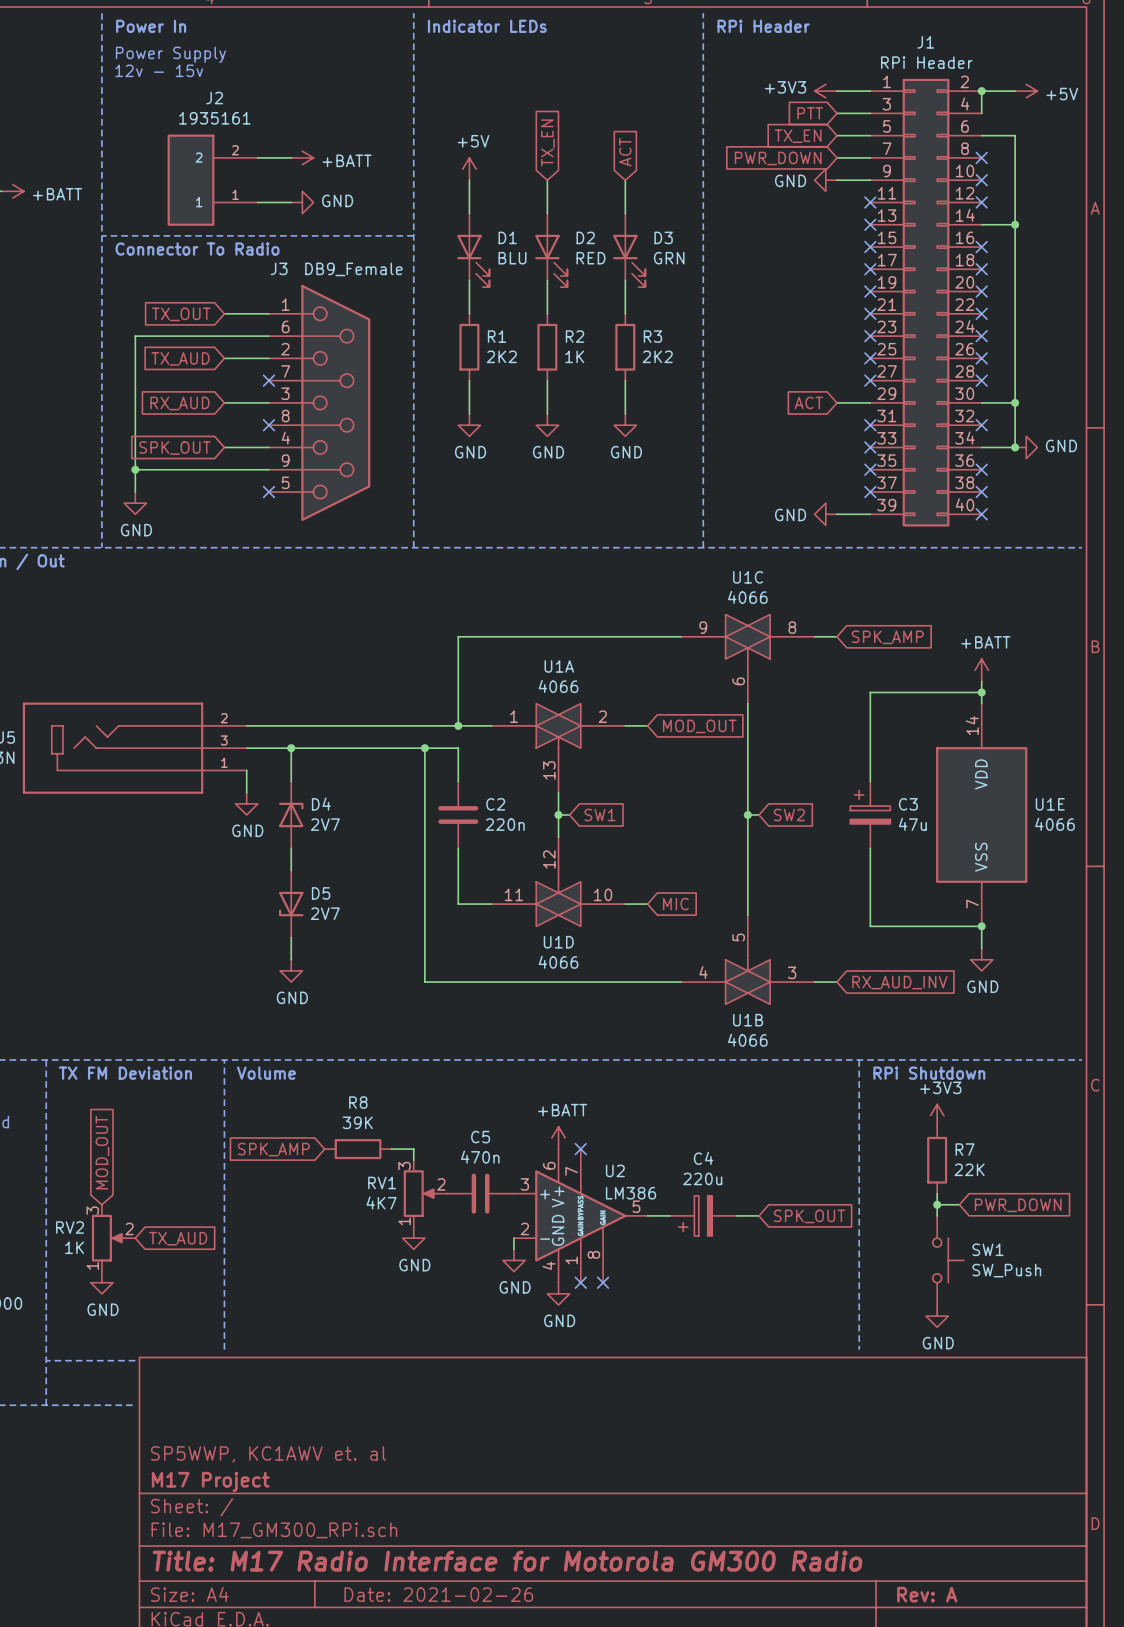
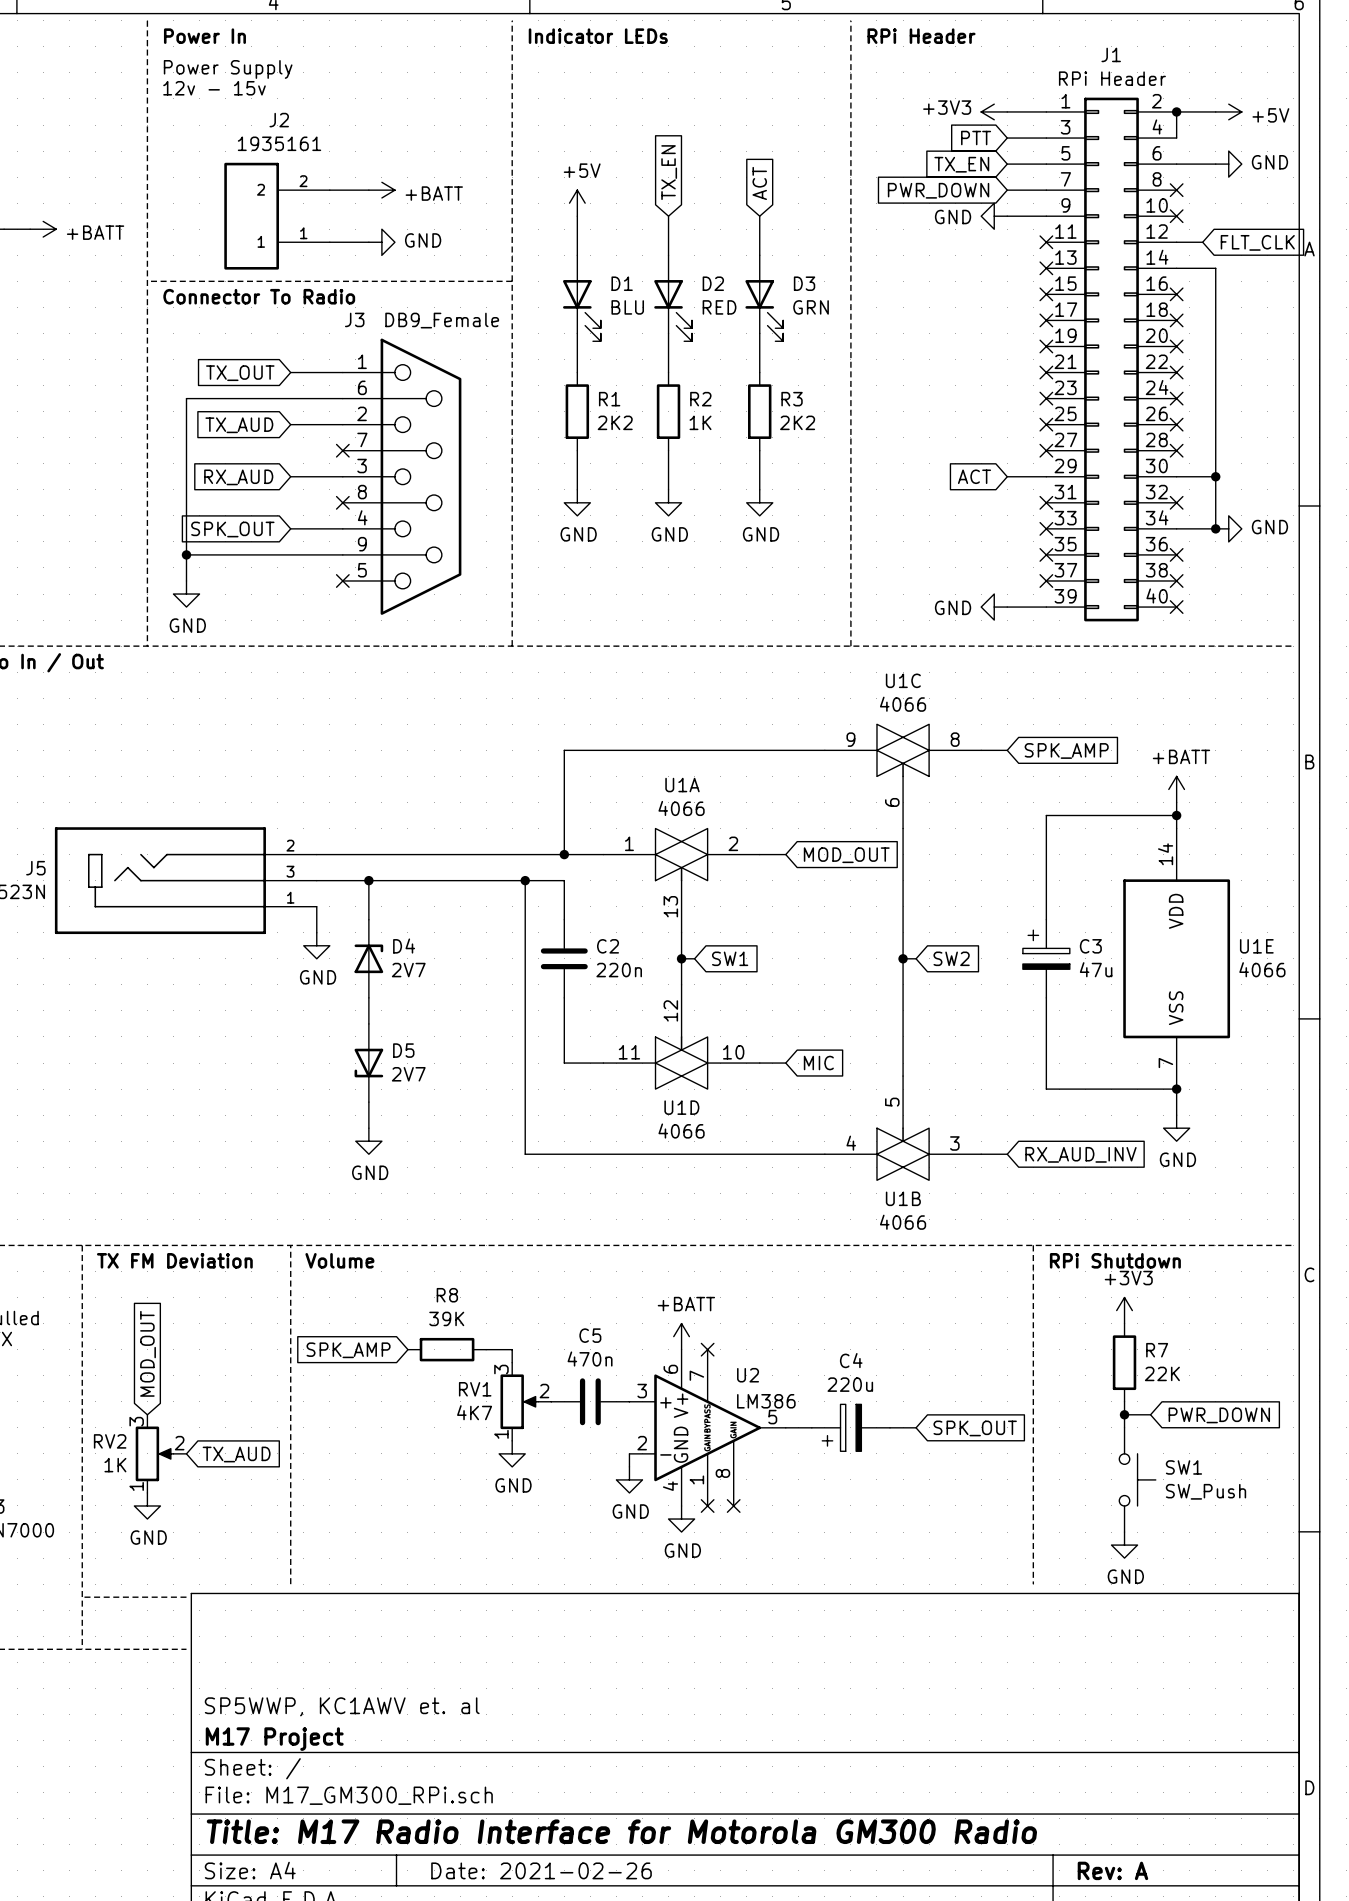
wire: (1015, 135) (1015, 224) -> none
power symbol: none -> GND (1228, 164)
wire: none -> (1176, 242) (1202, 242)
no-connect mark: (981, 202) -> none
global label: none -> FLT_CLK (1257, 242)
junction: (1015, 224) -> none

